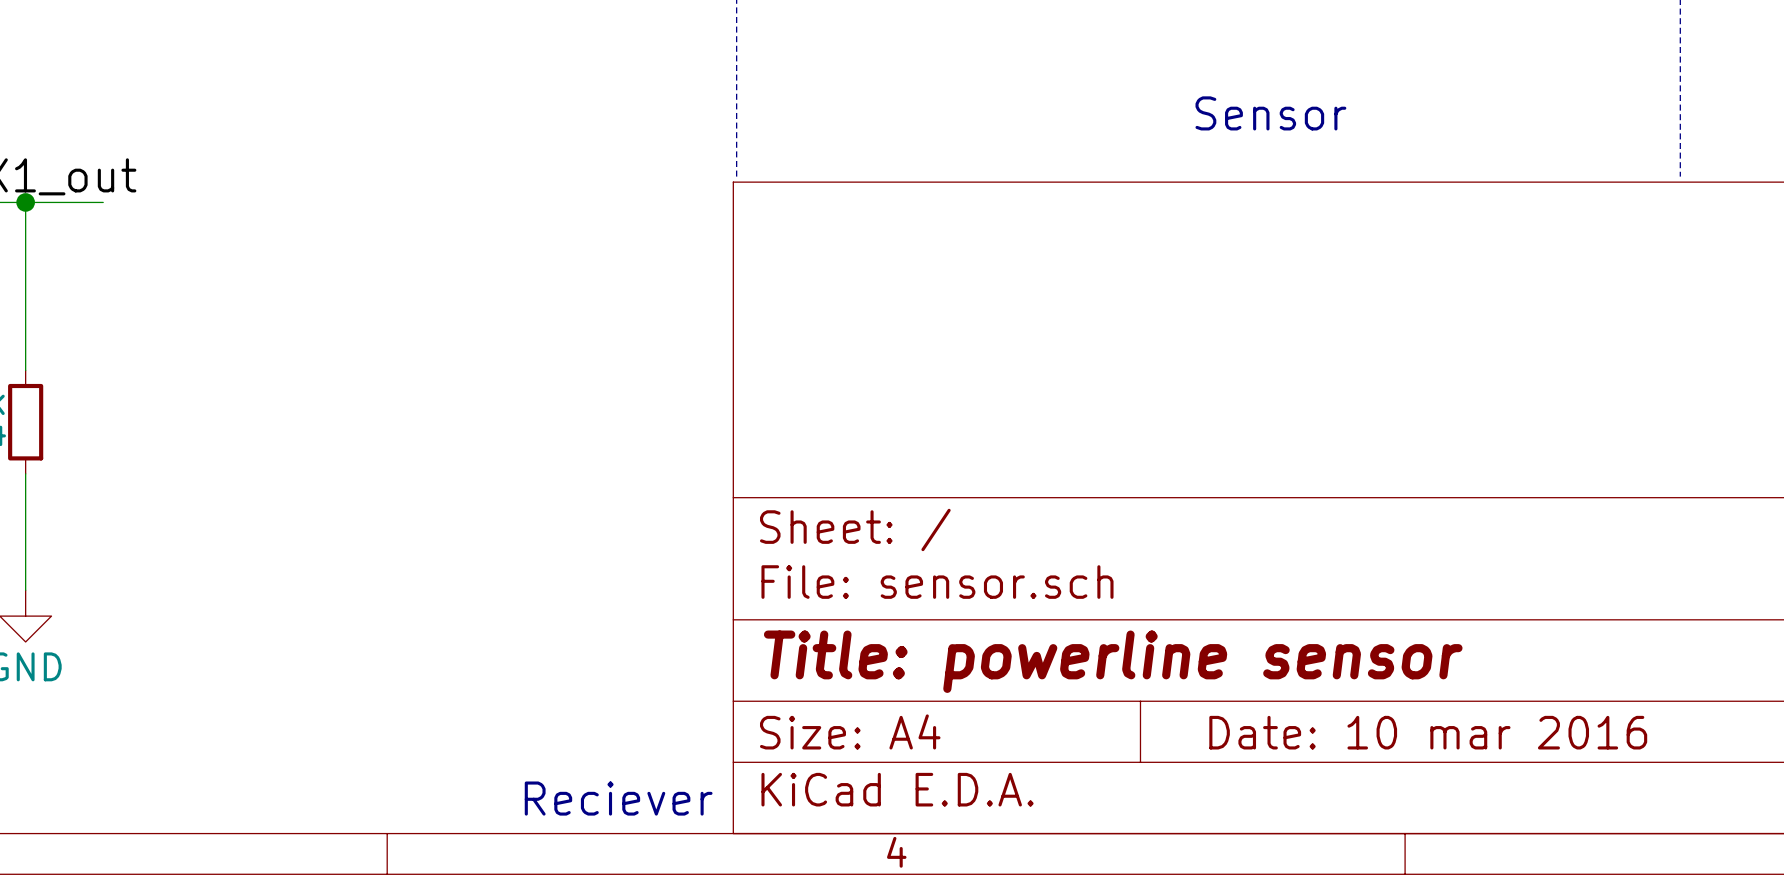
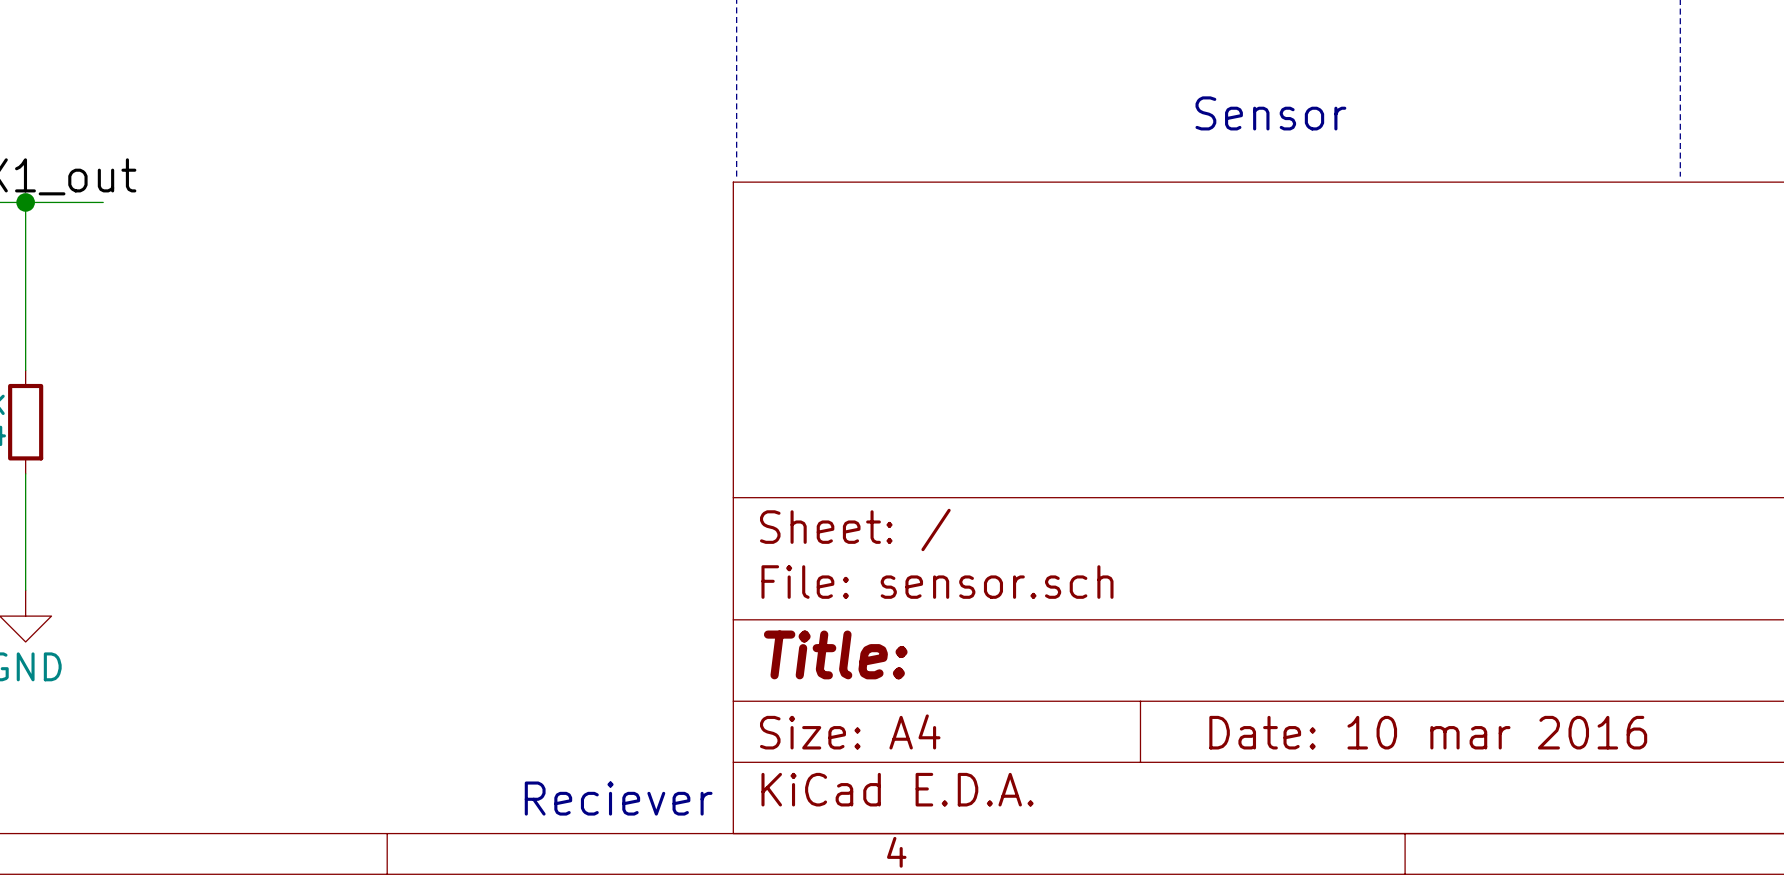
title block: Title: powerline sensor (1113, 661) -> Title: (835, 654)

